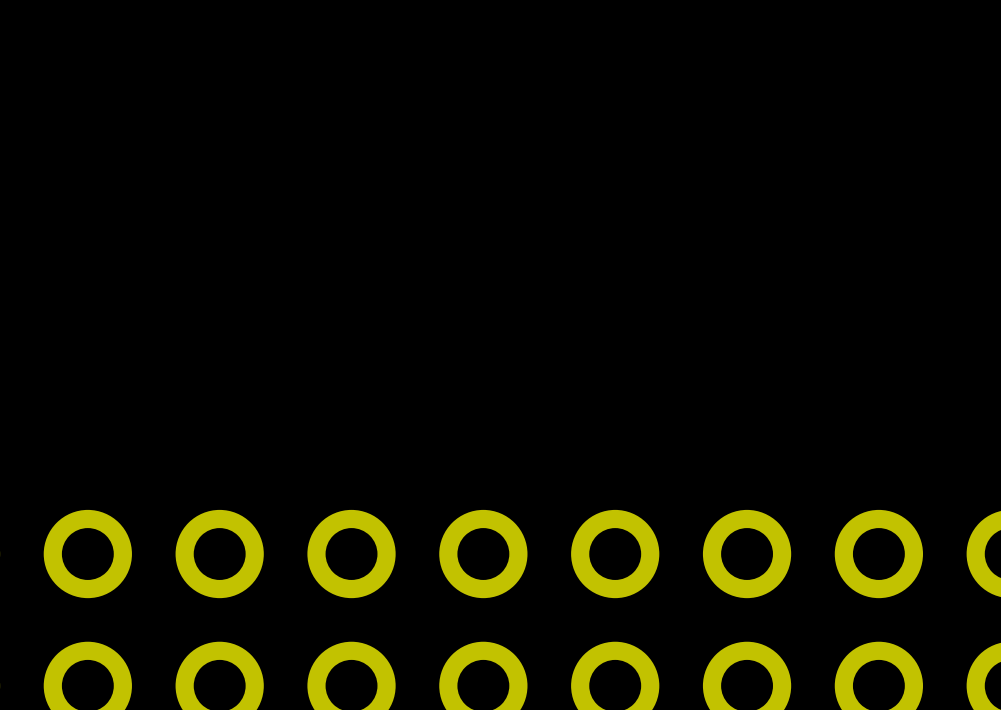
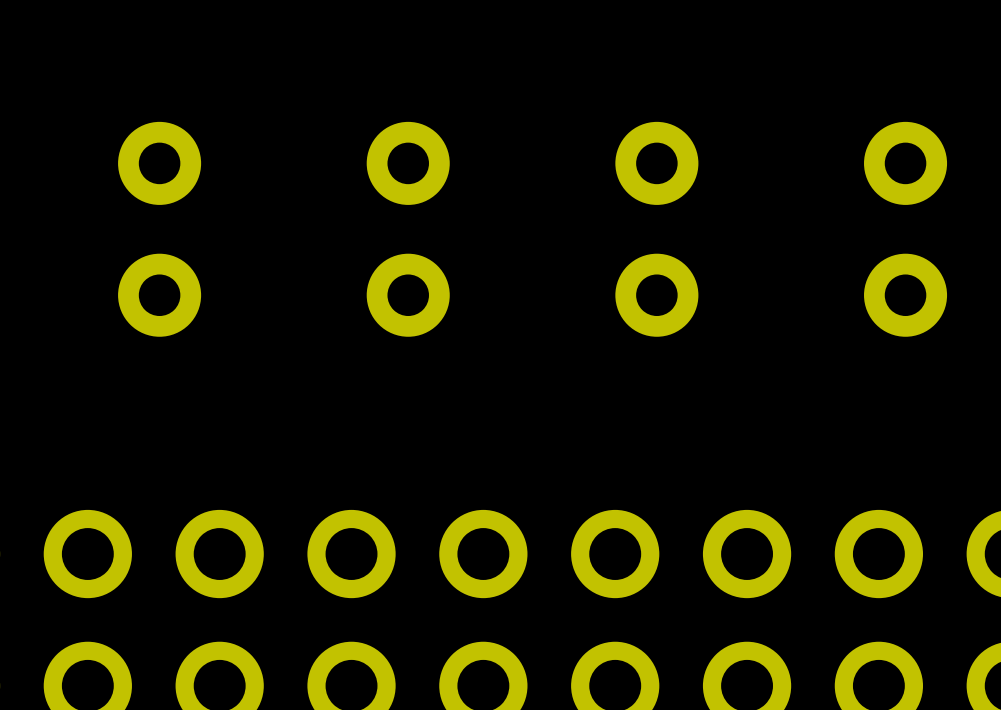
part: none -> (159, 229)
part: none -> (408, 229)
part: none -> (656, 229)
part: none -> (905, 229)

